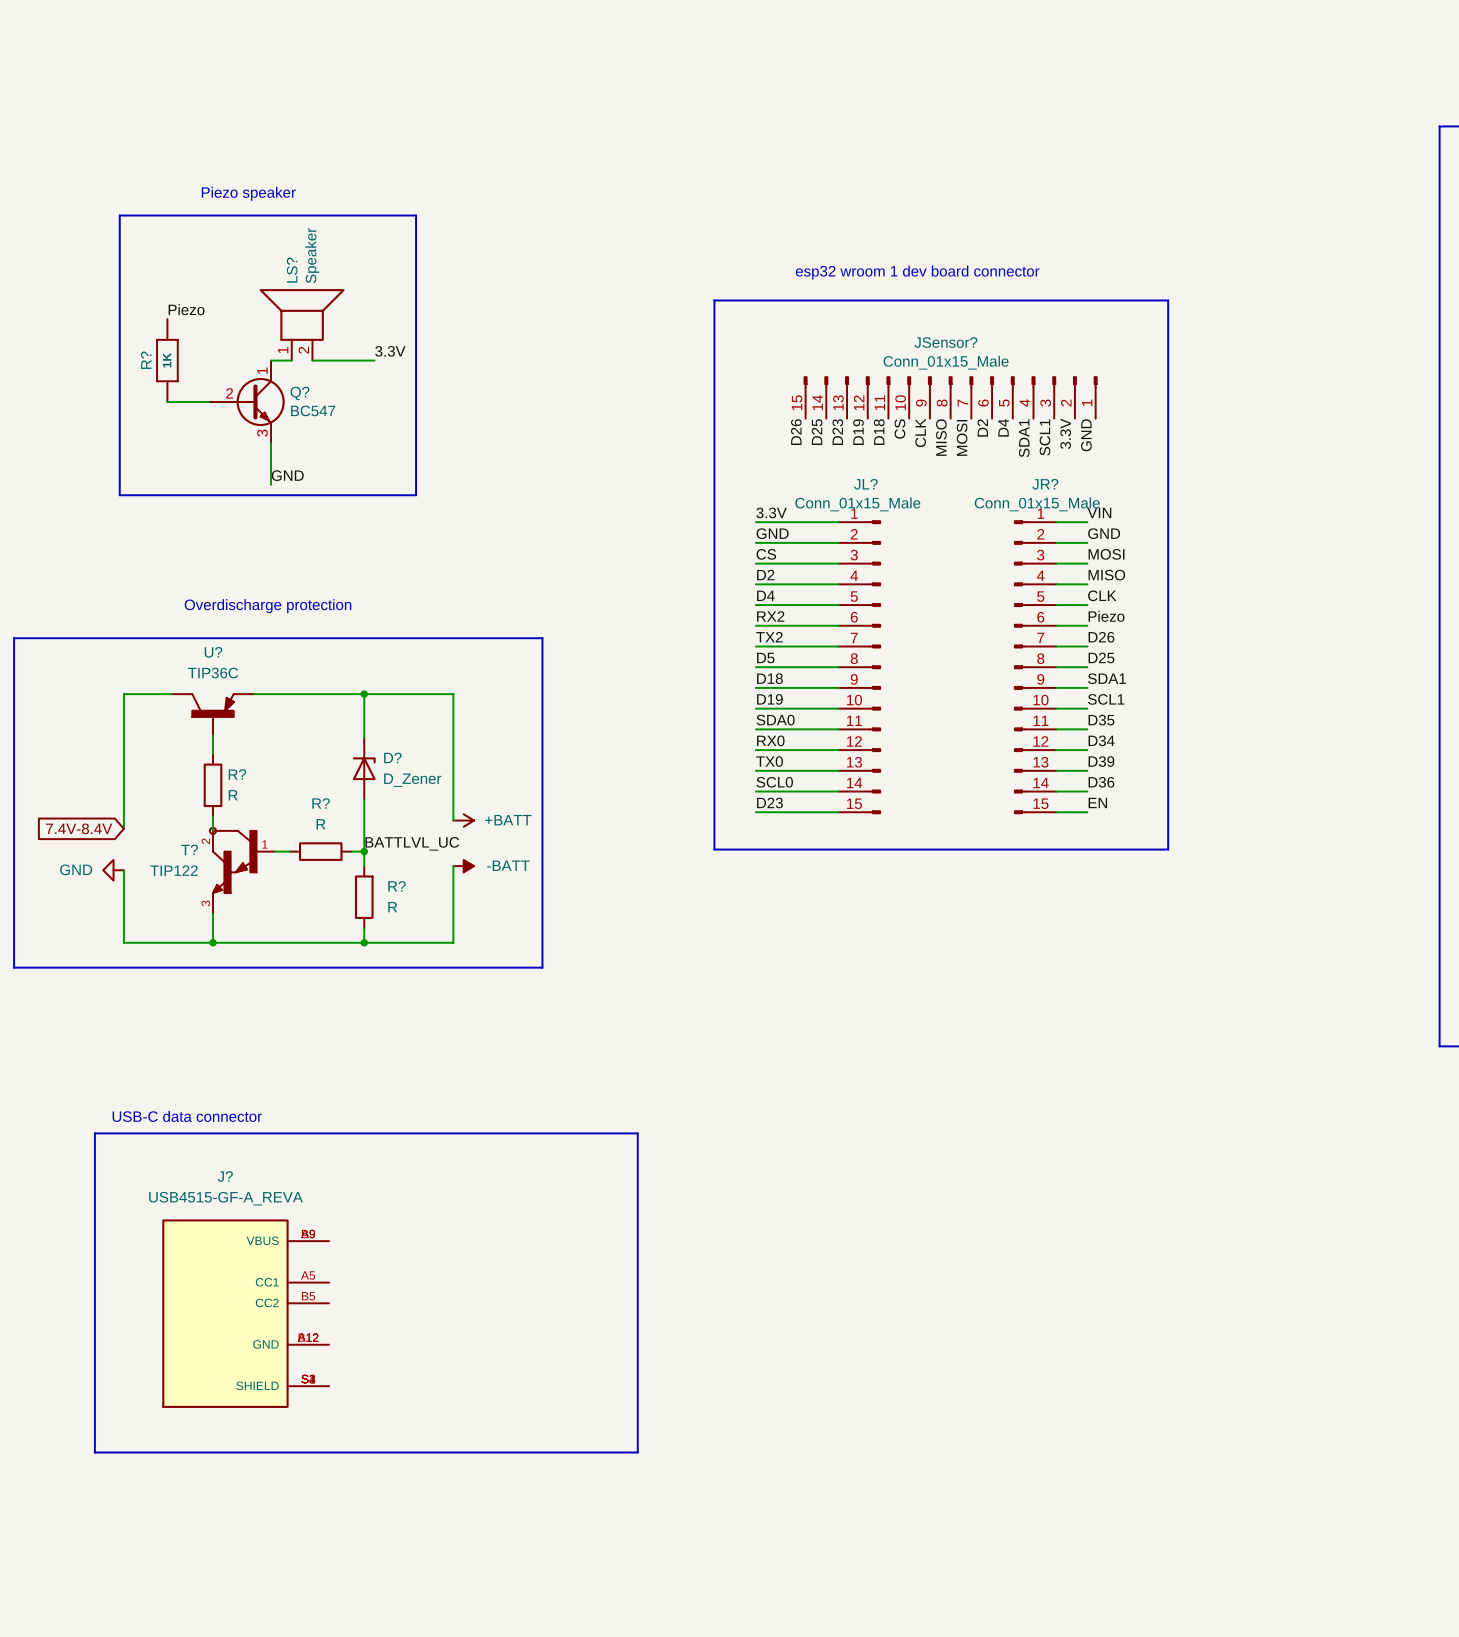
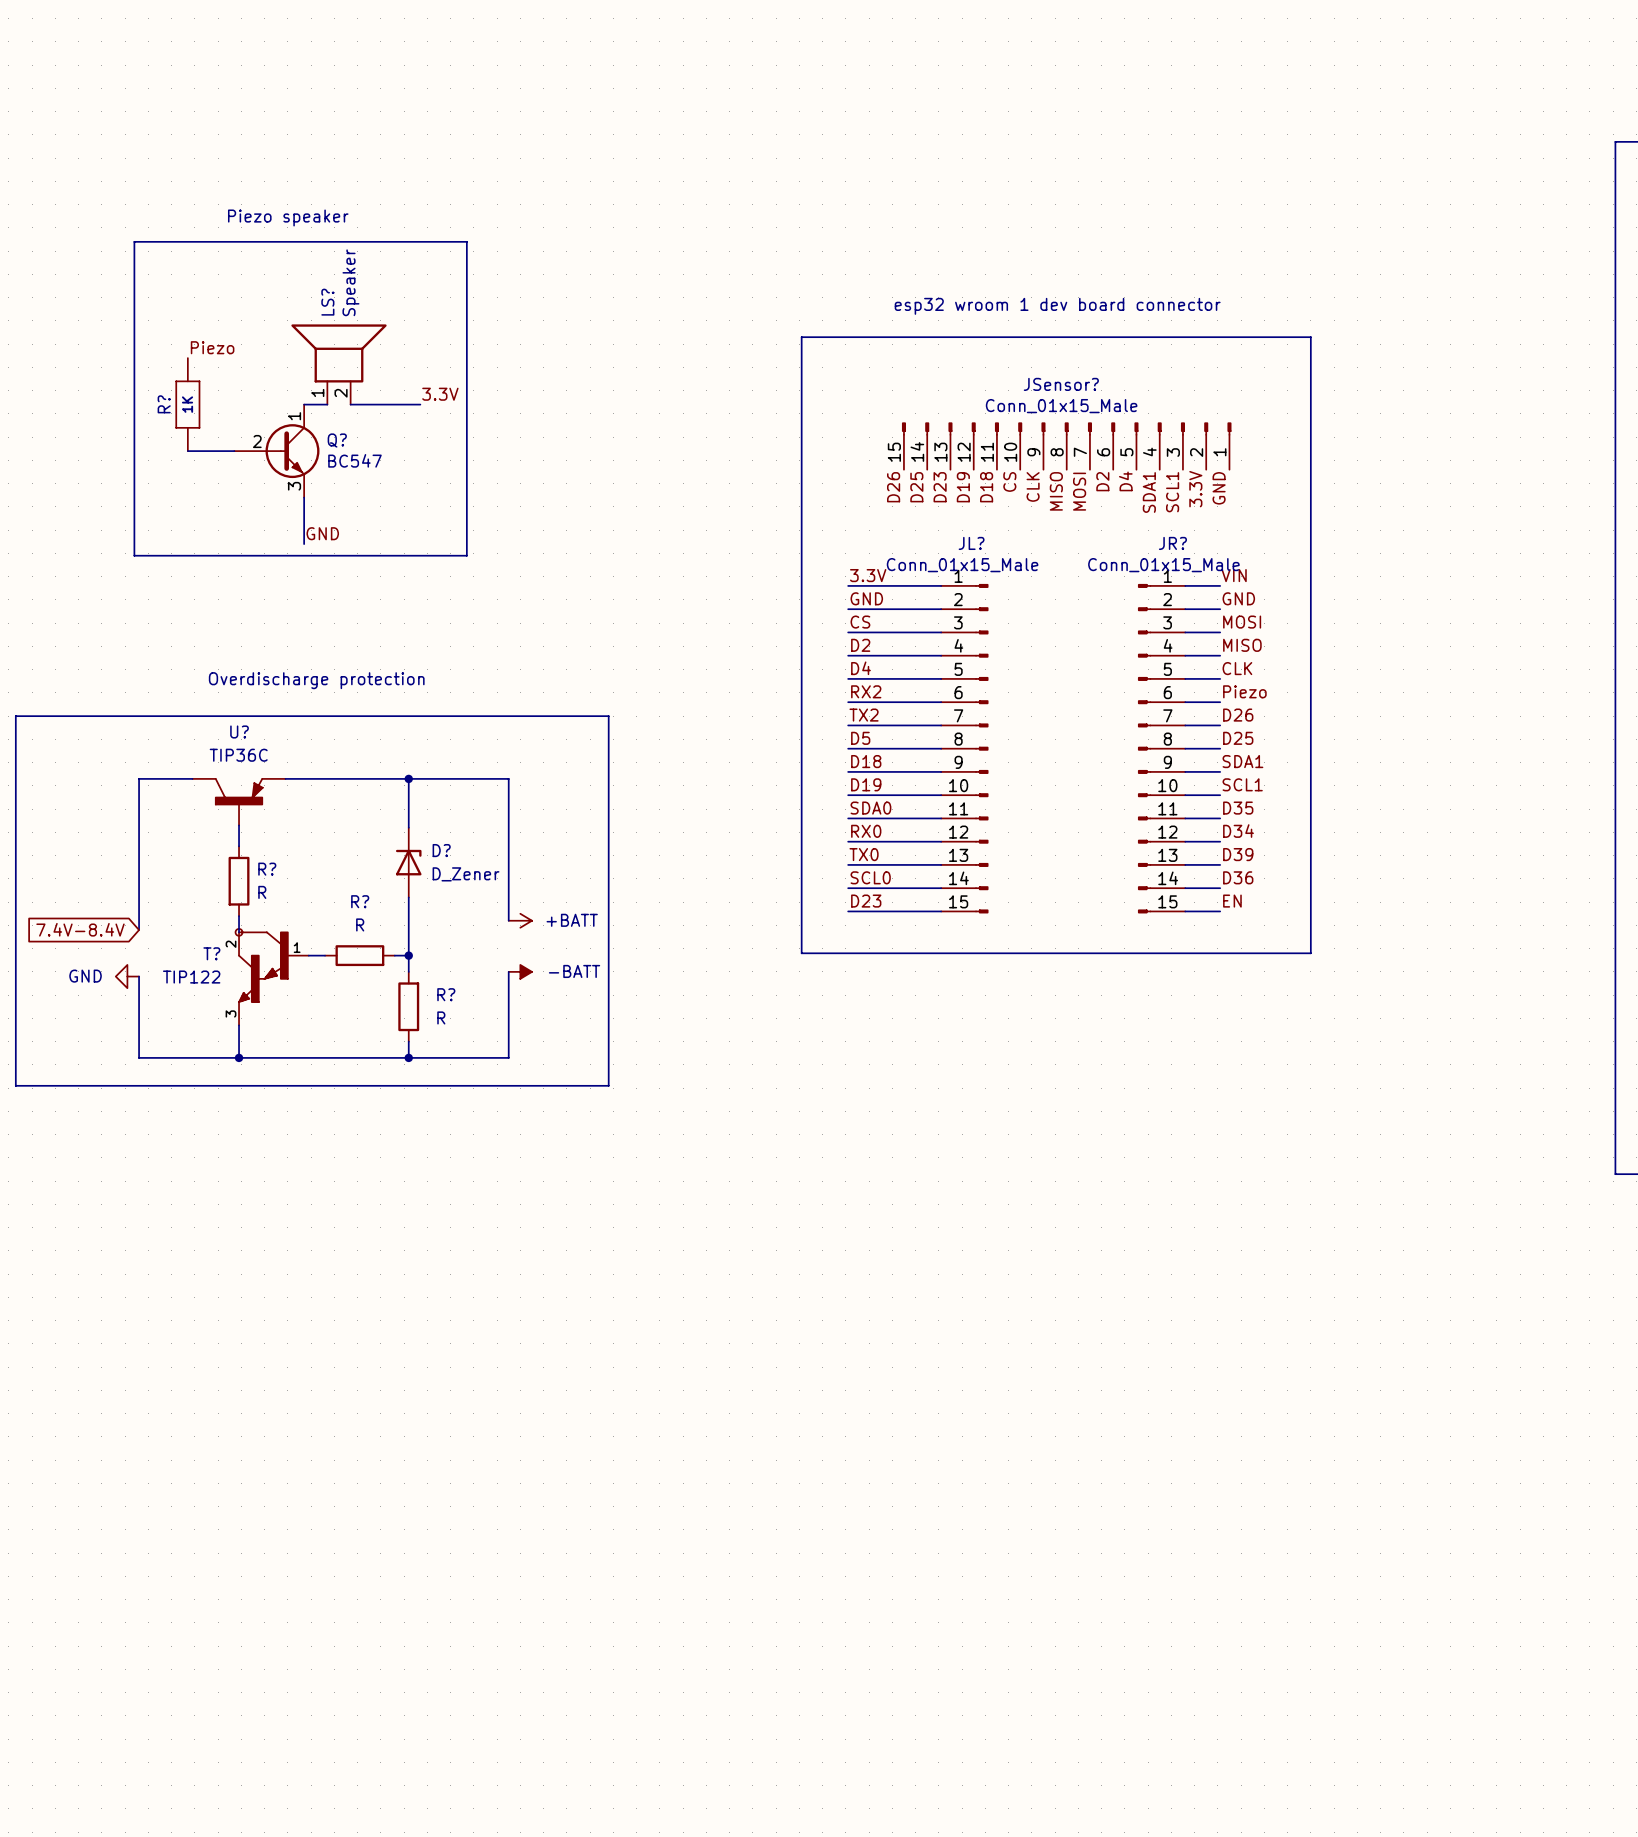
label: BATTLVL_UC (412, 843) -> none
text: USB-C data connector (187, 1116) -> none
line: (94, 1133) (94, 1452) (637, 1452) (637, 1133) (94, 1133) -> none
J?: USB4515-GF-A_REVA (245, 1313) -> none

